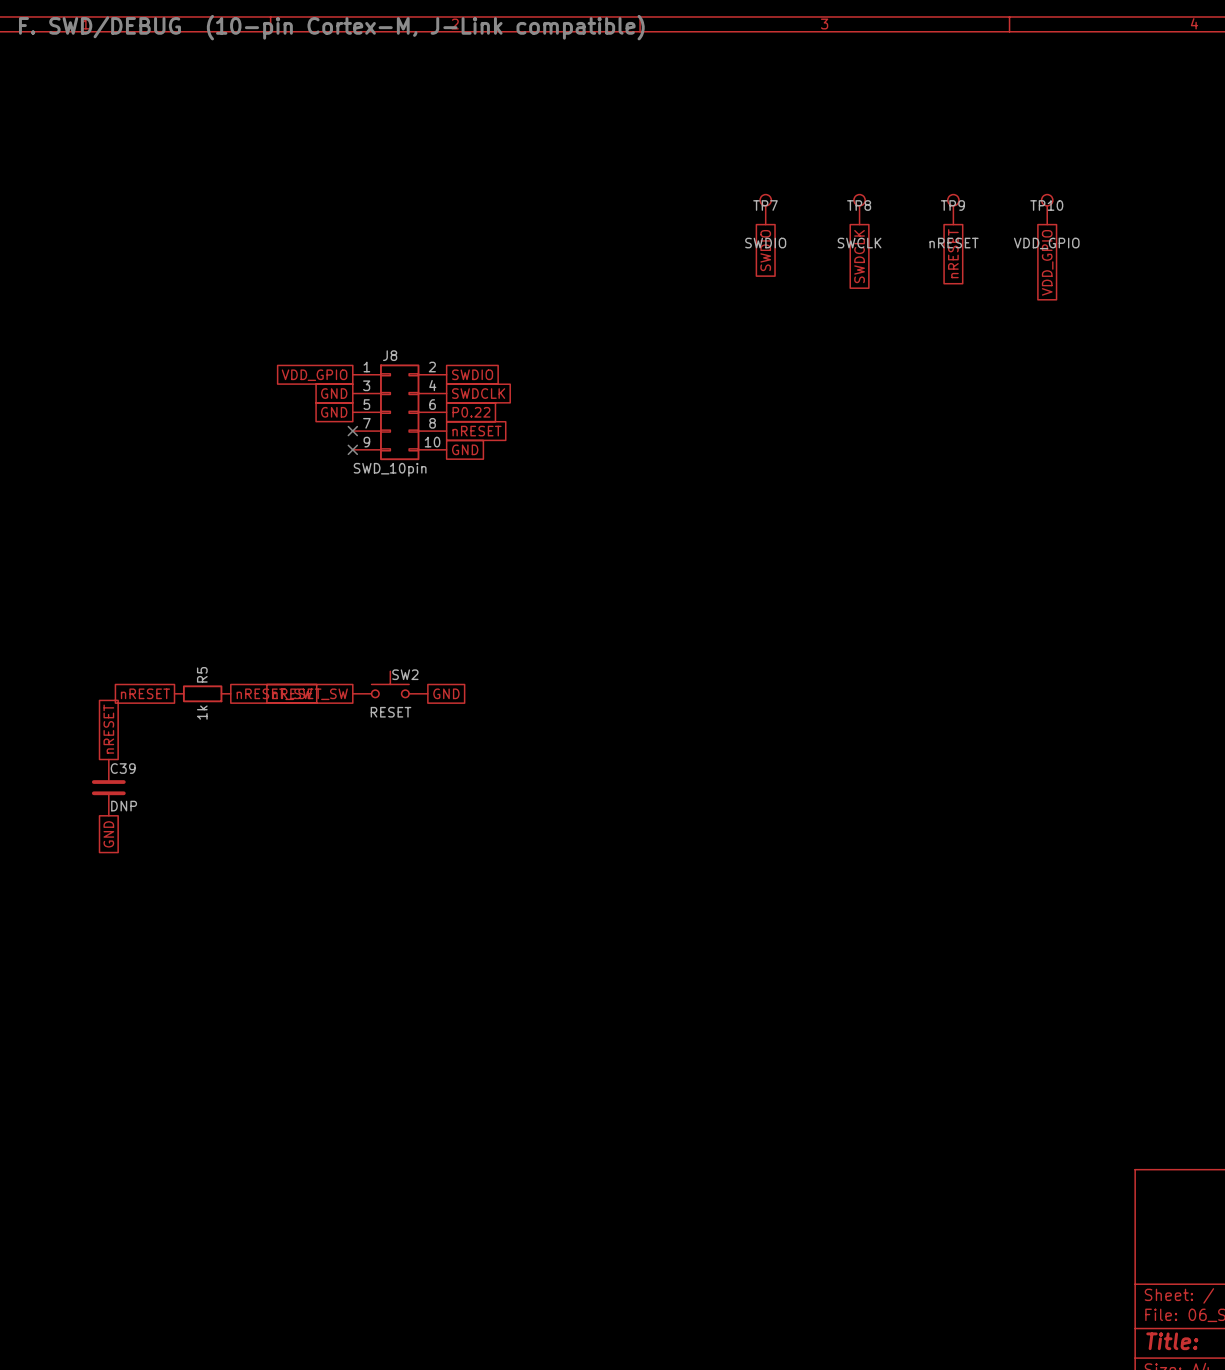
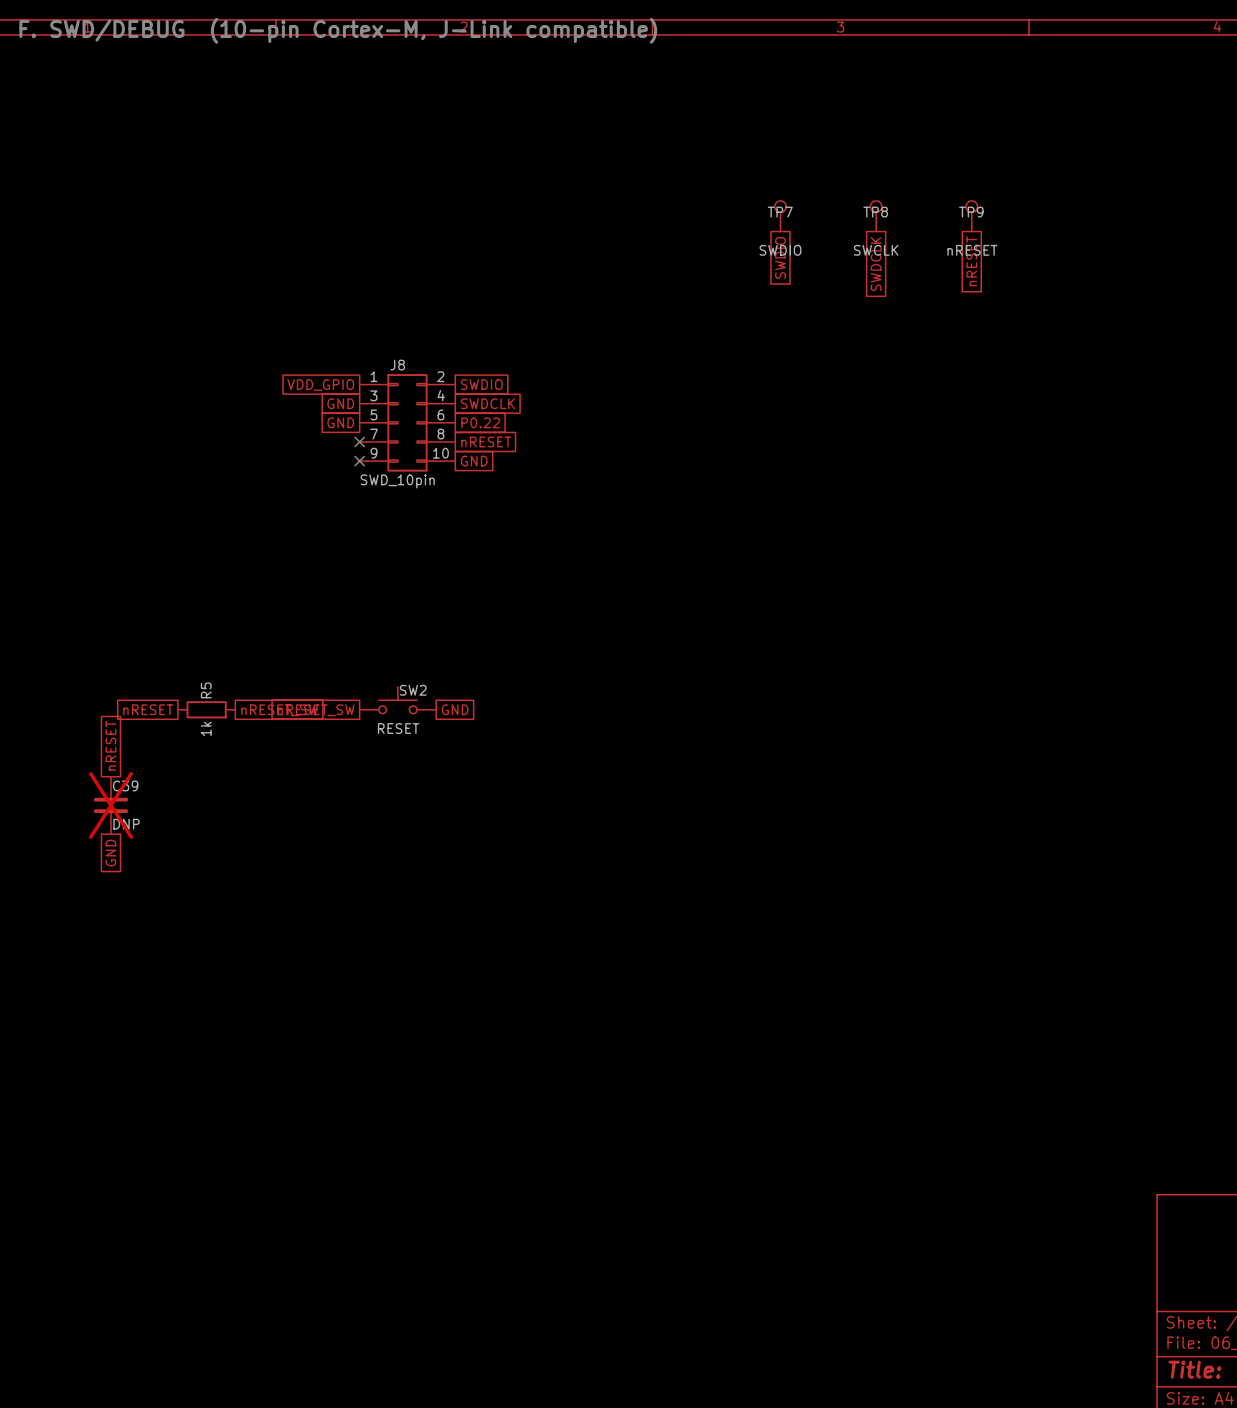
TP10: VDD_GPIO (1047, 209) -> none
global label: VDD_GPIO (1047, 262) -> none
C39 do-not-place cross: none -> (110, 805)

